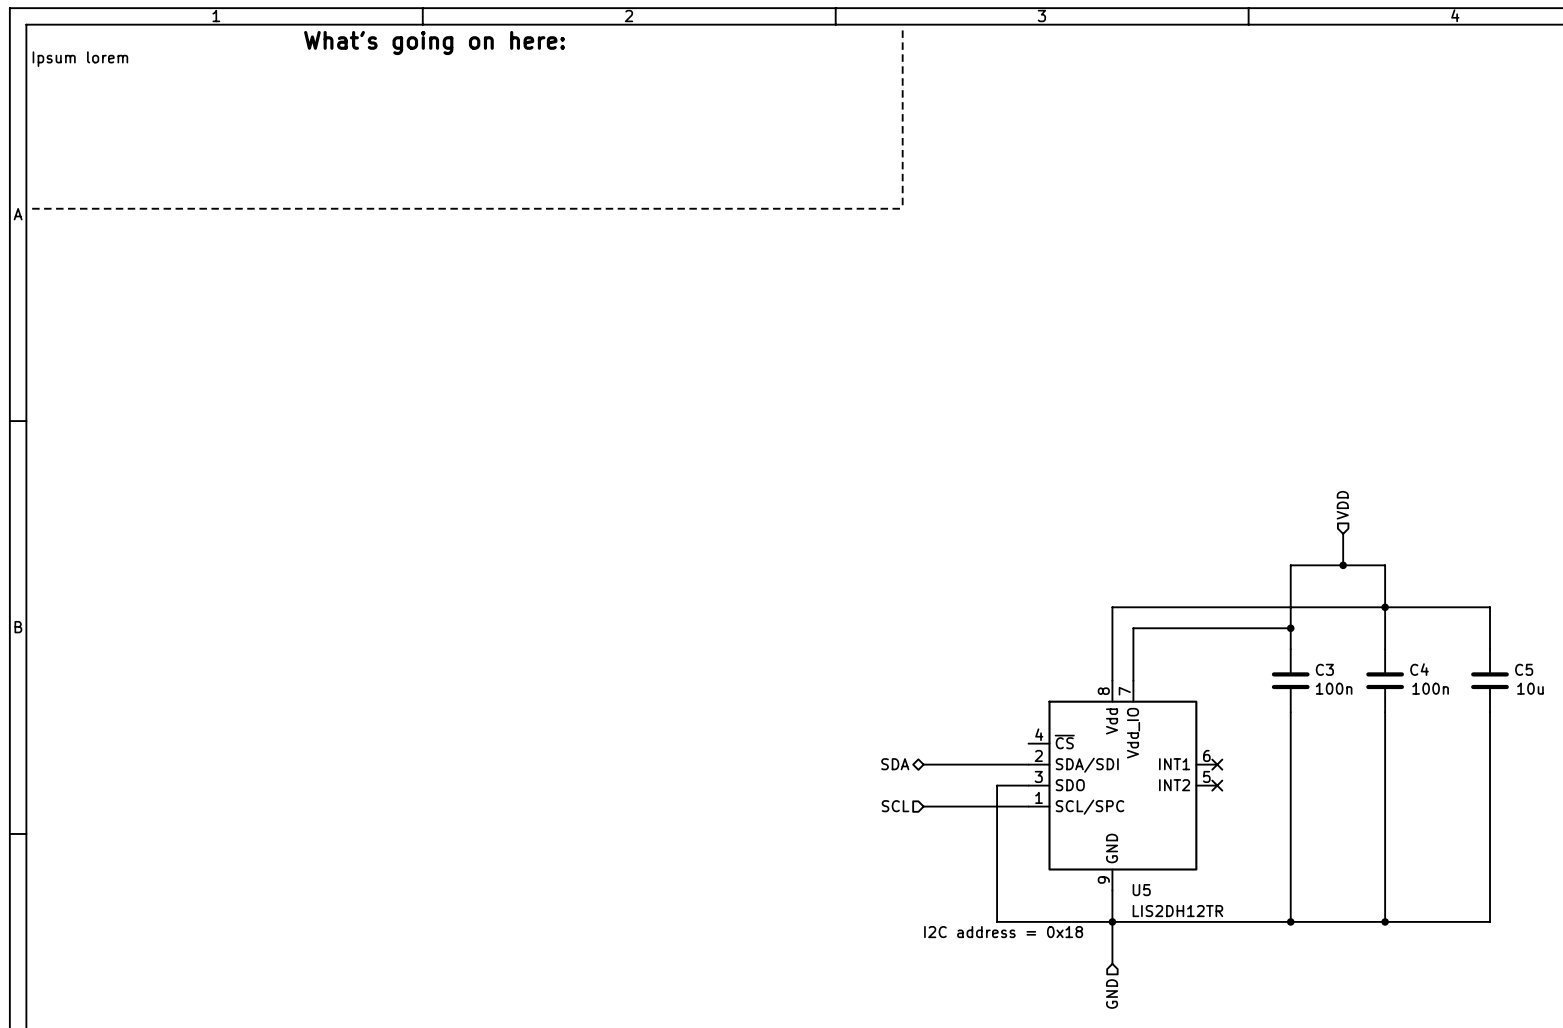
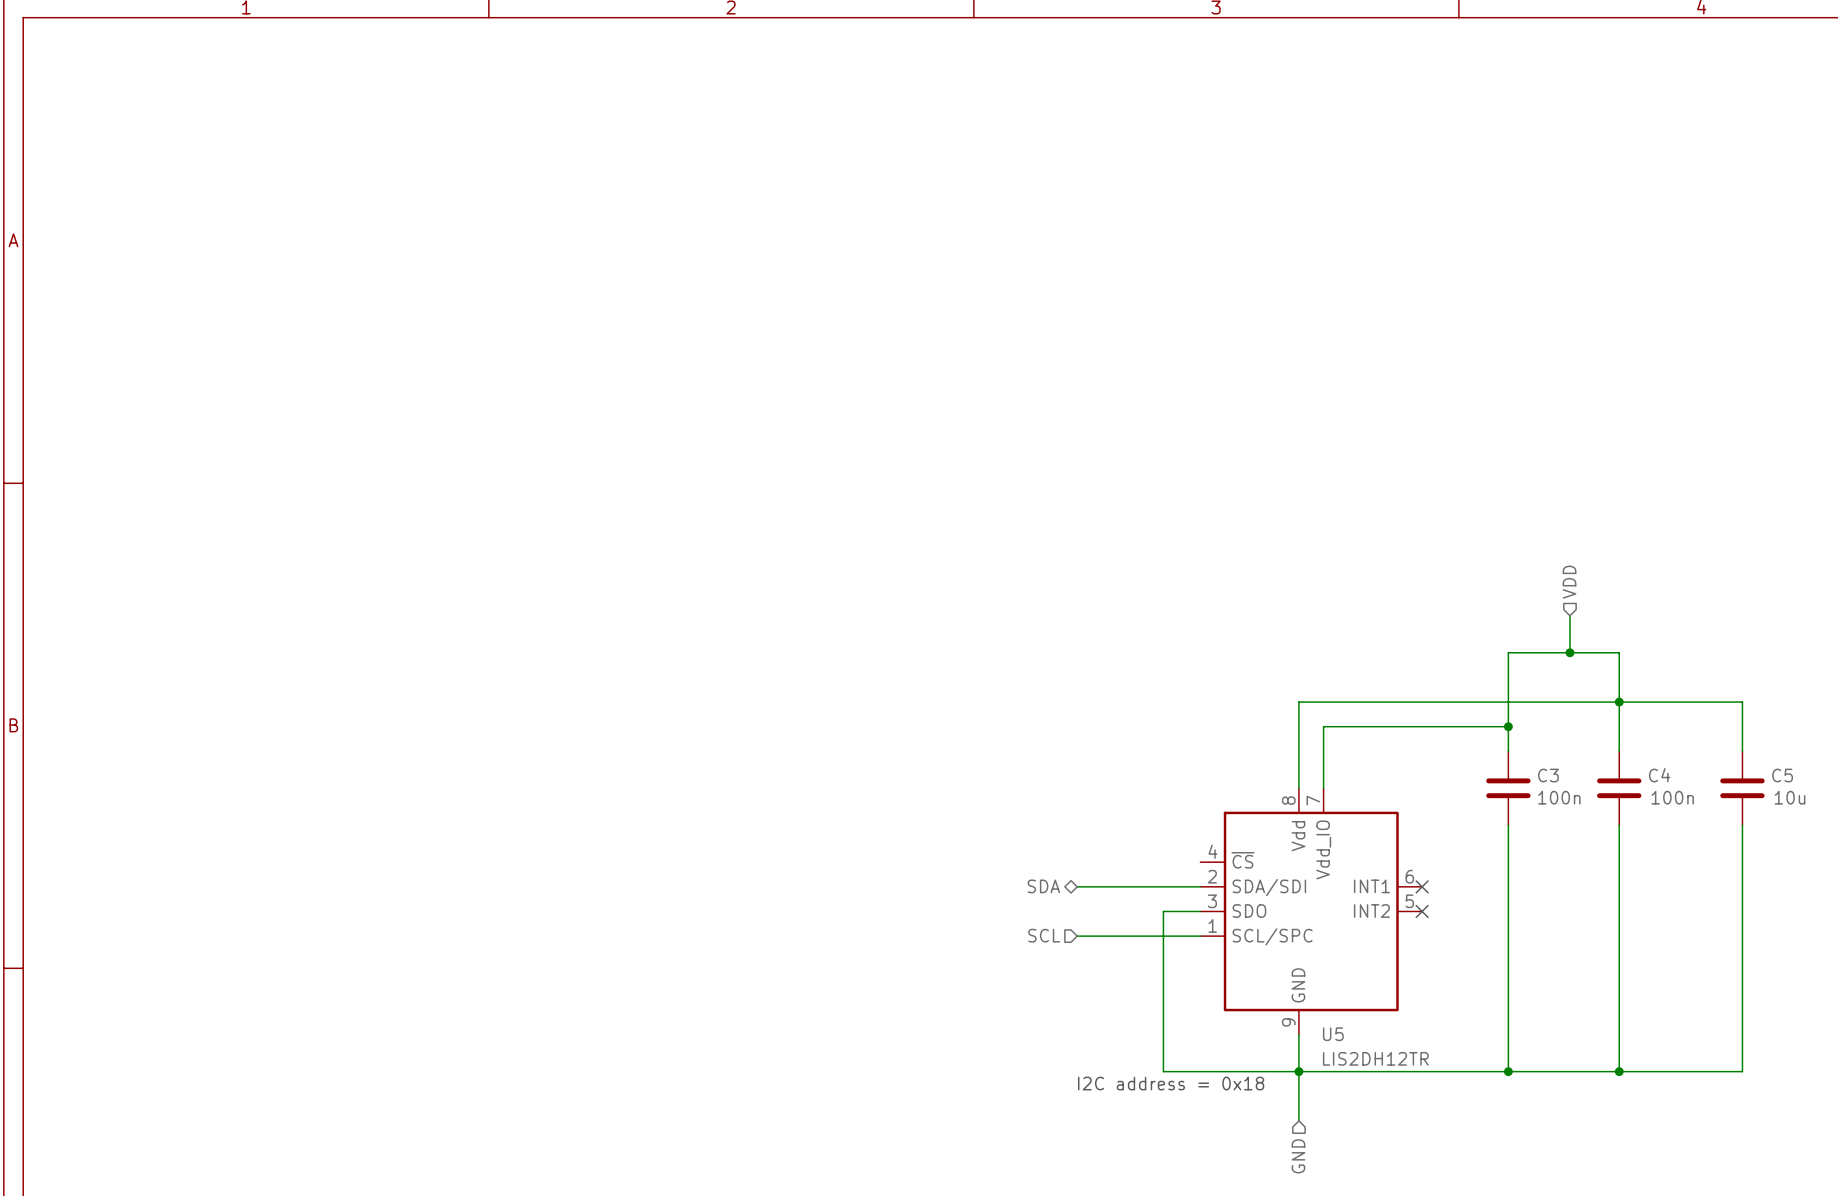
line: (902, 30) (902, 208) (32, 208) -> none
text: What's going on here: (434, 43) -> none
text: Ipsum lorem (80, 59) -> none

